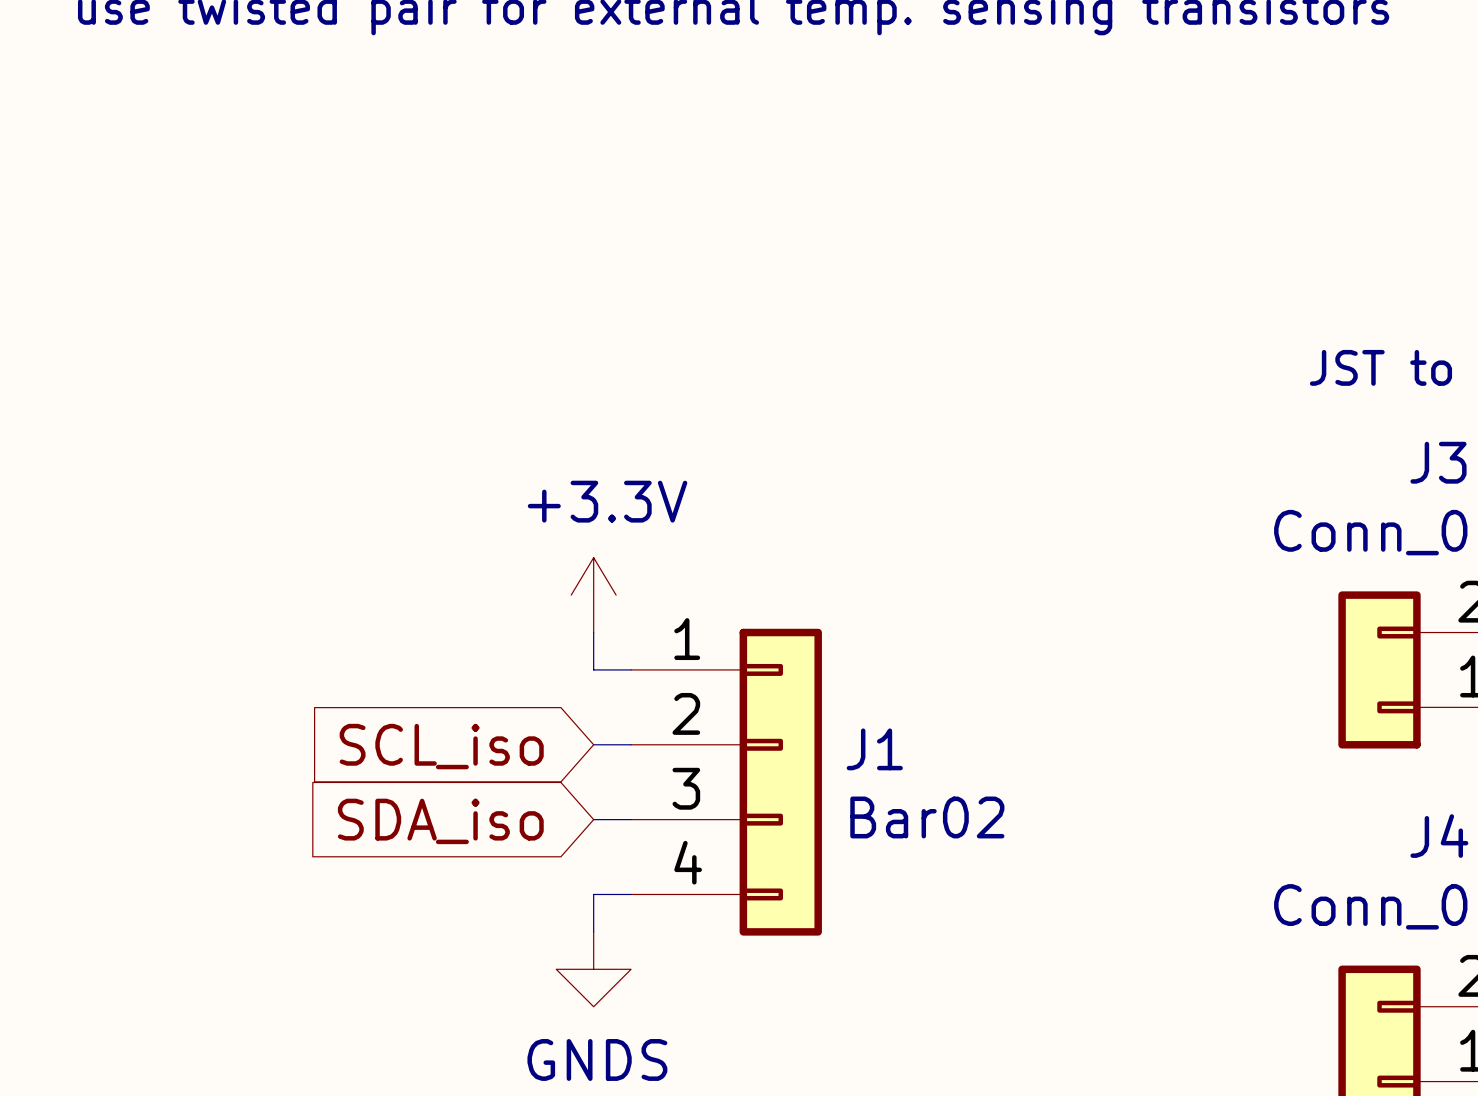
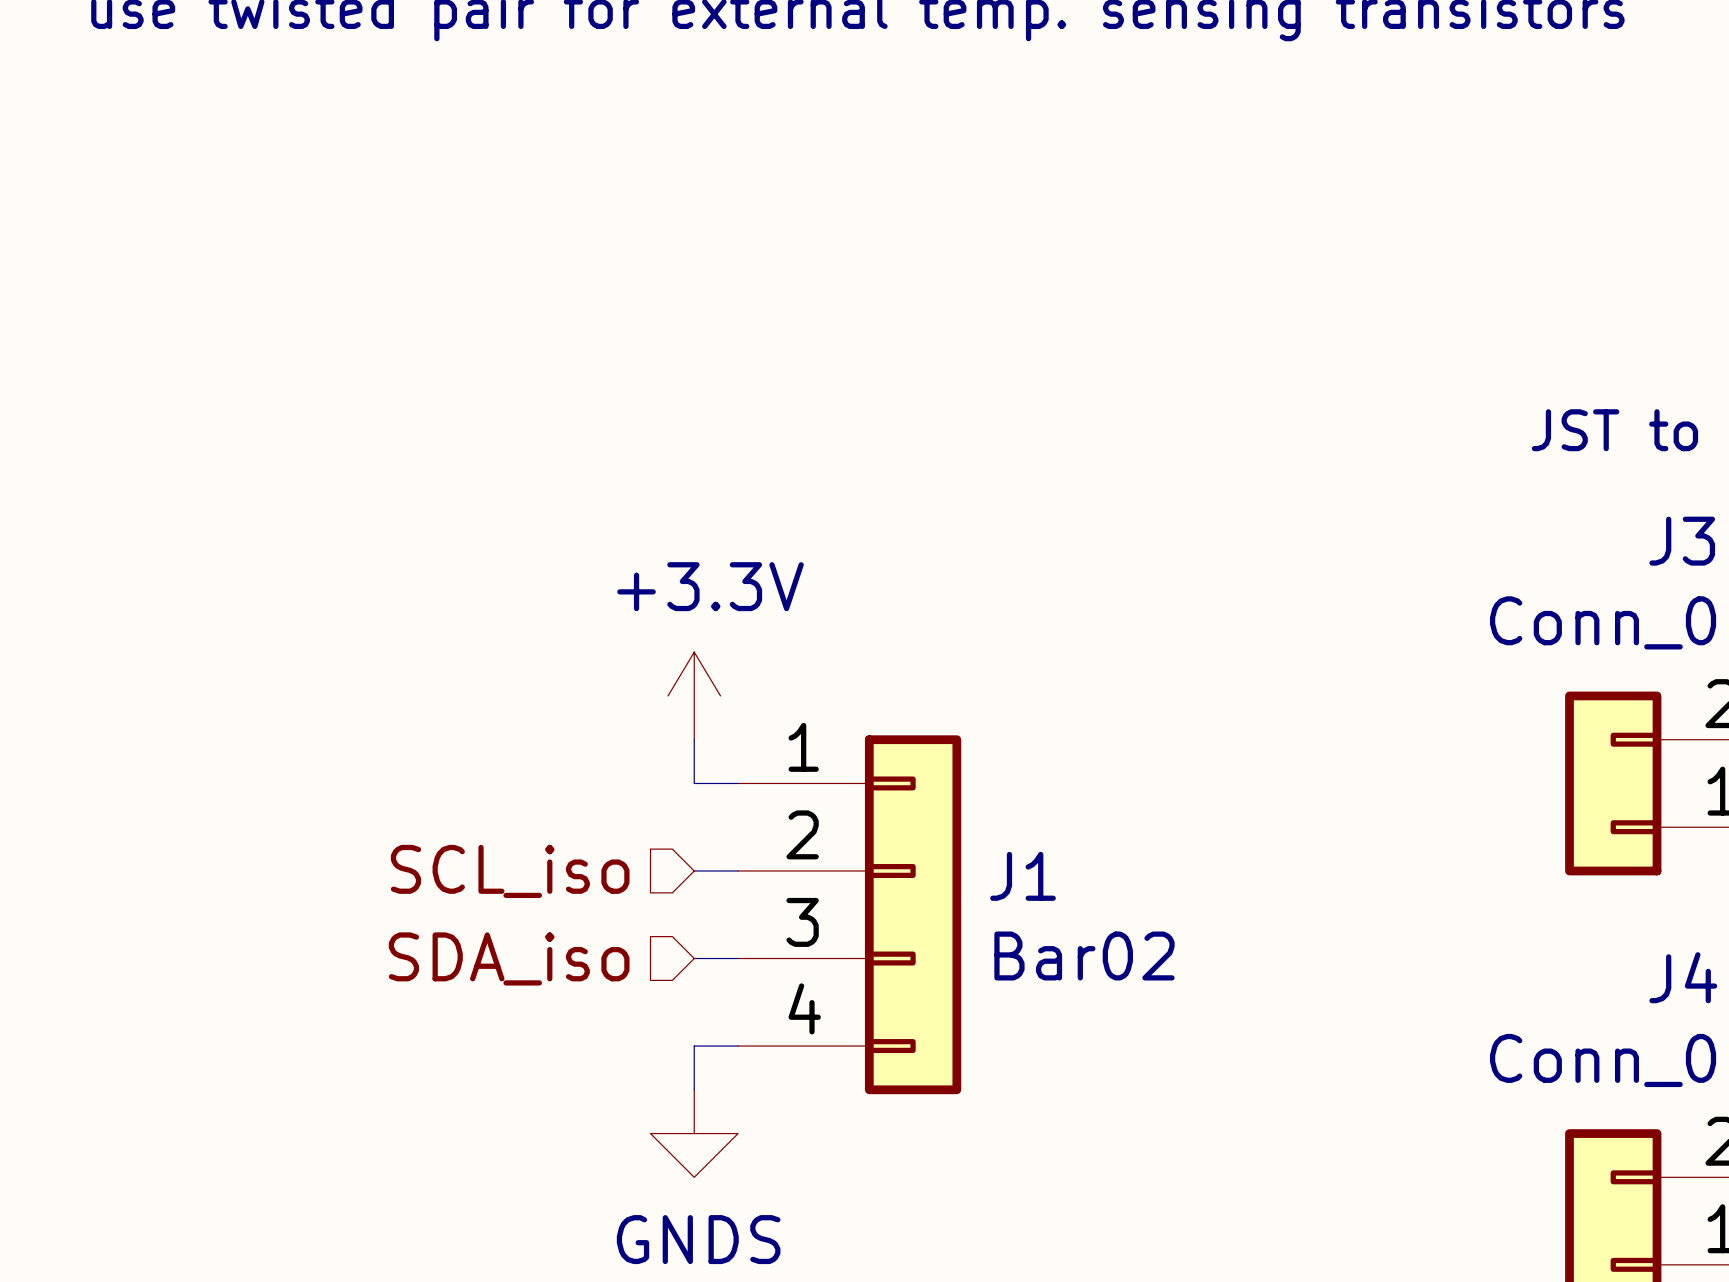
hierarchical label: none -> SCL_iso (510, 871)
global label: SCL_iso (441, 746) -> none
hierarchical label: none -> SDA_iso (509, 958)
global label: SDA_iso (440, 821) -> none

